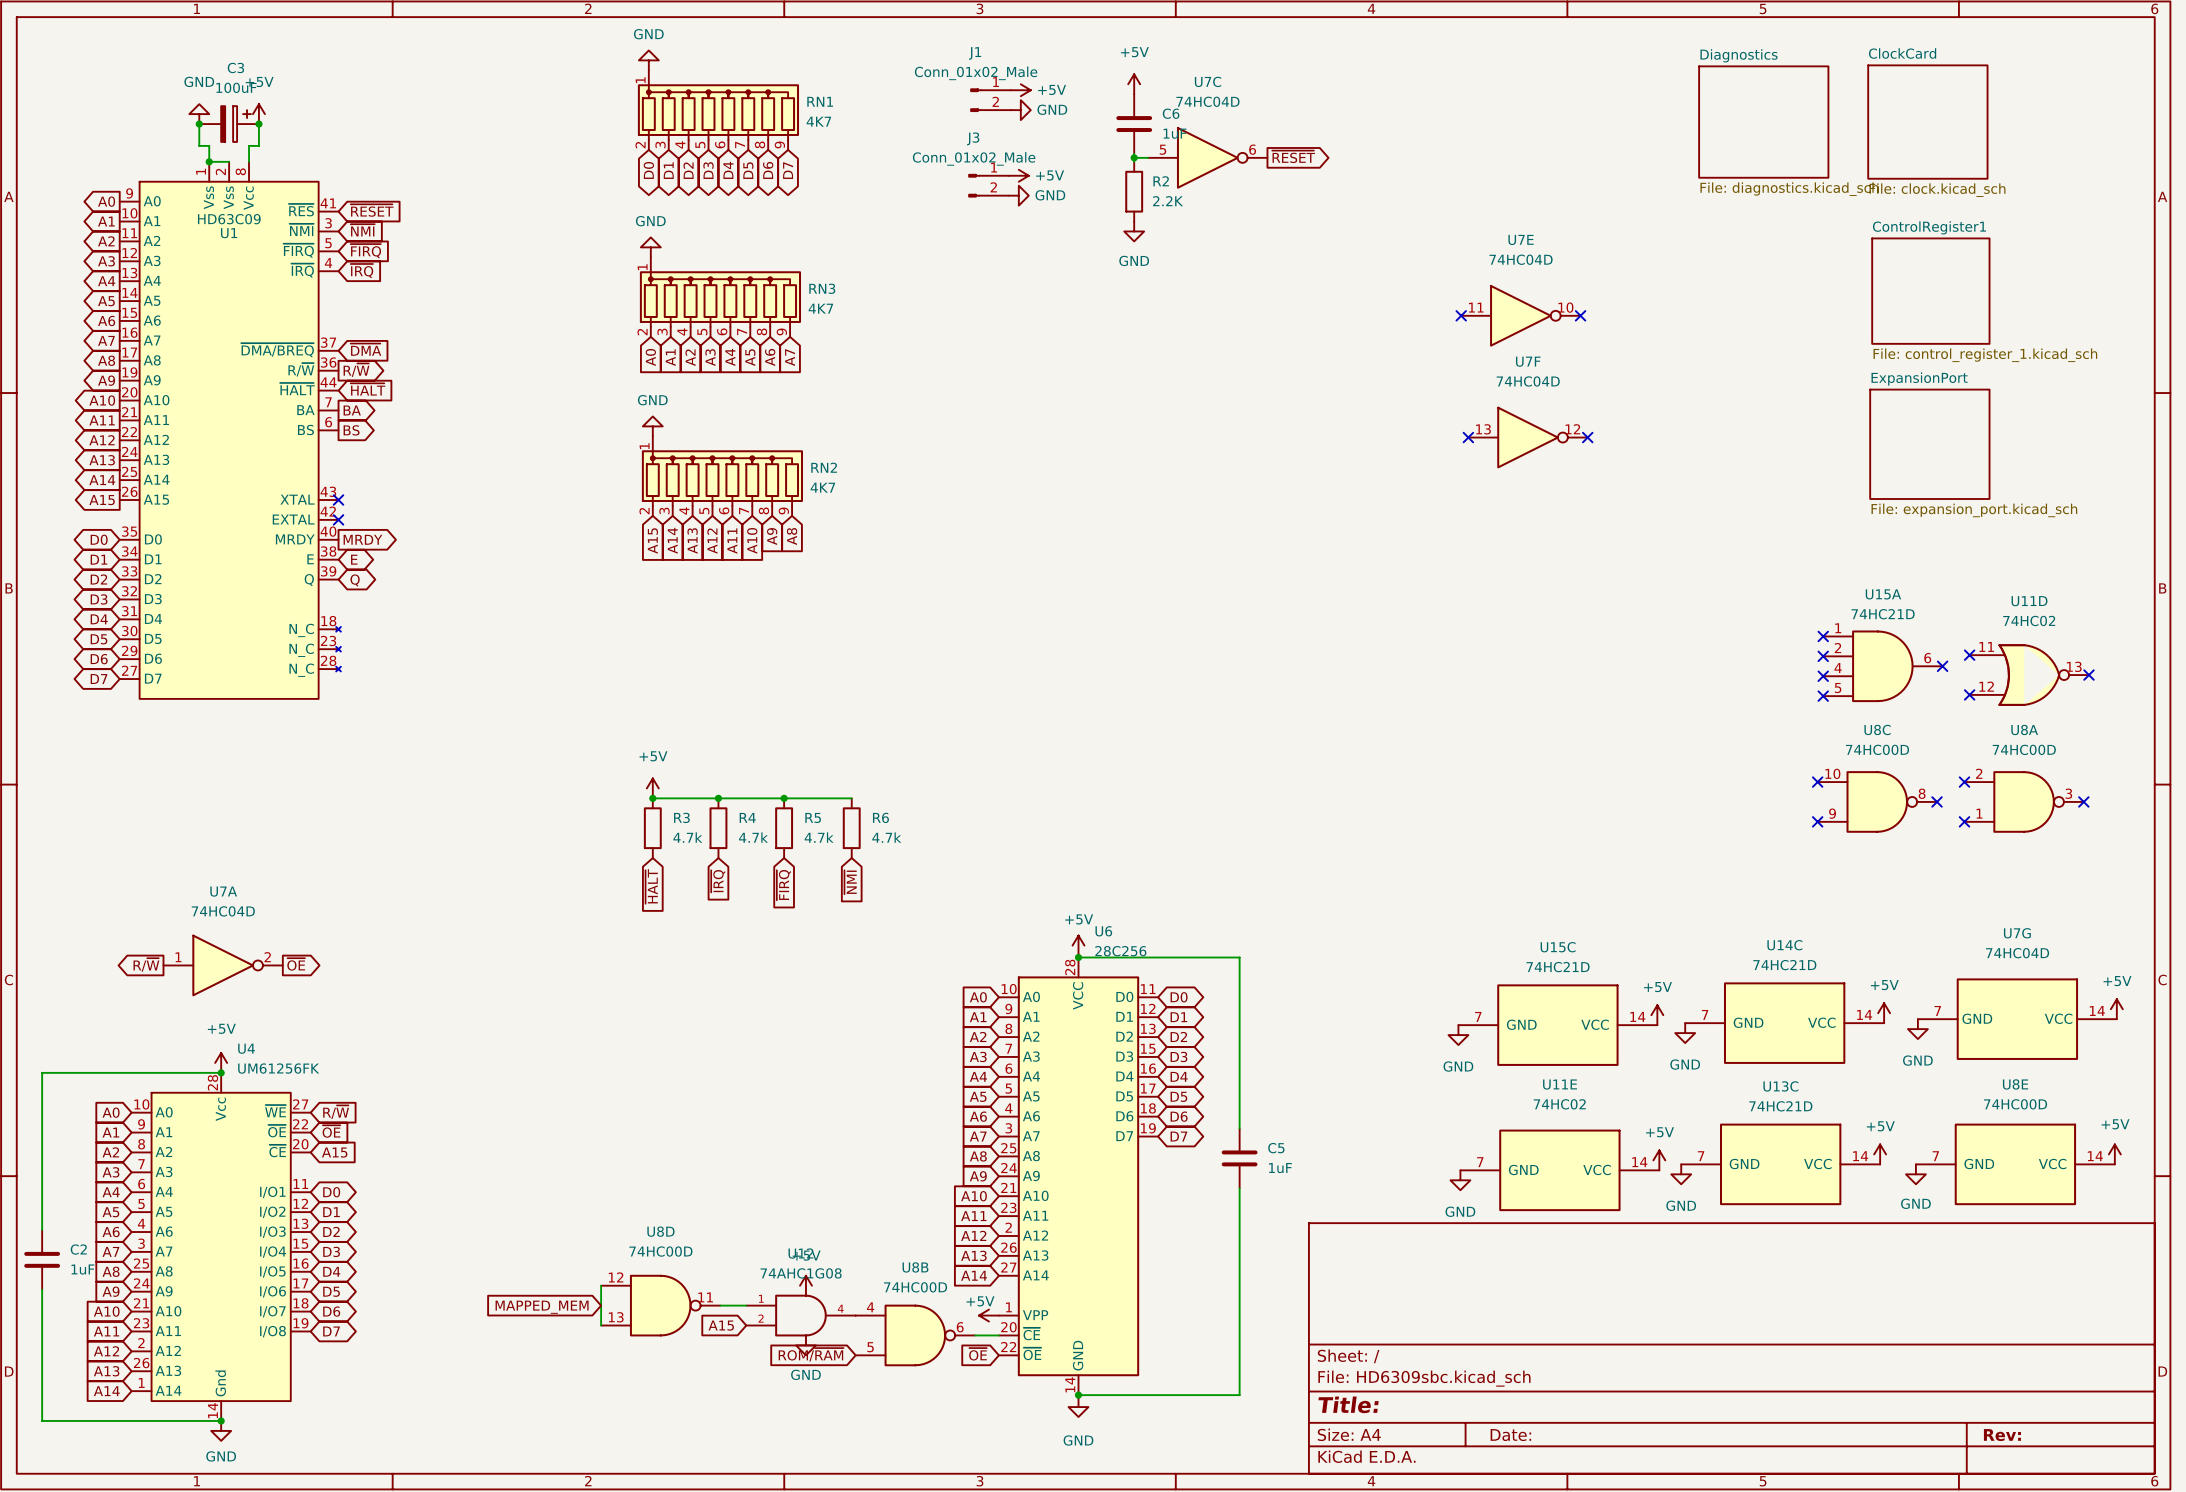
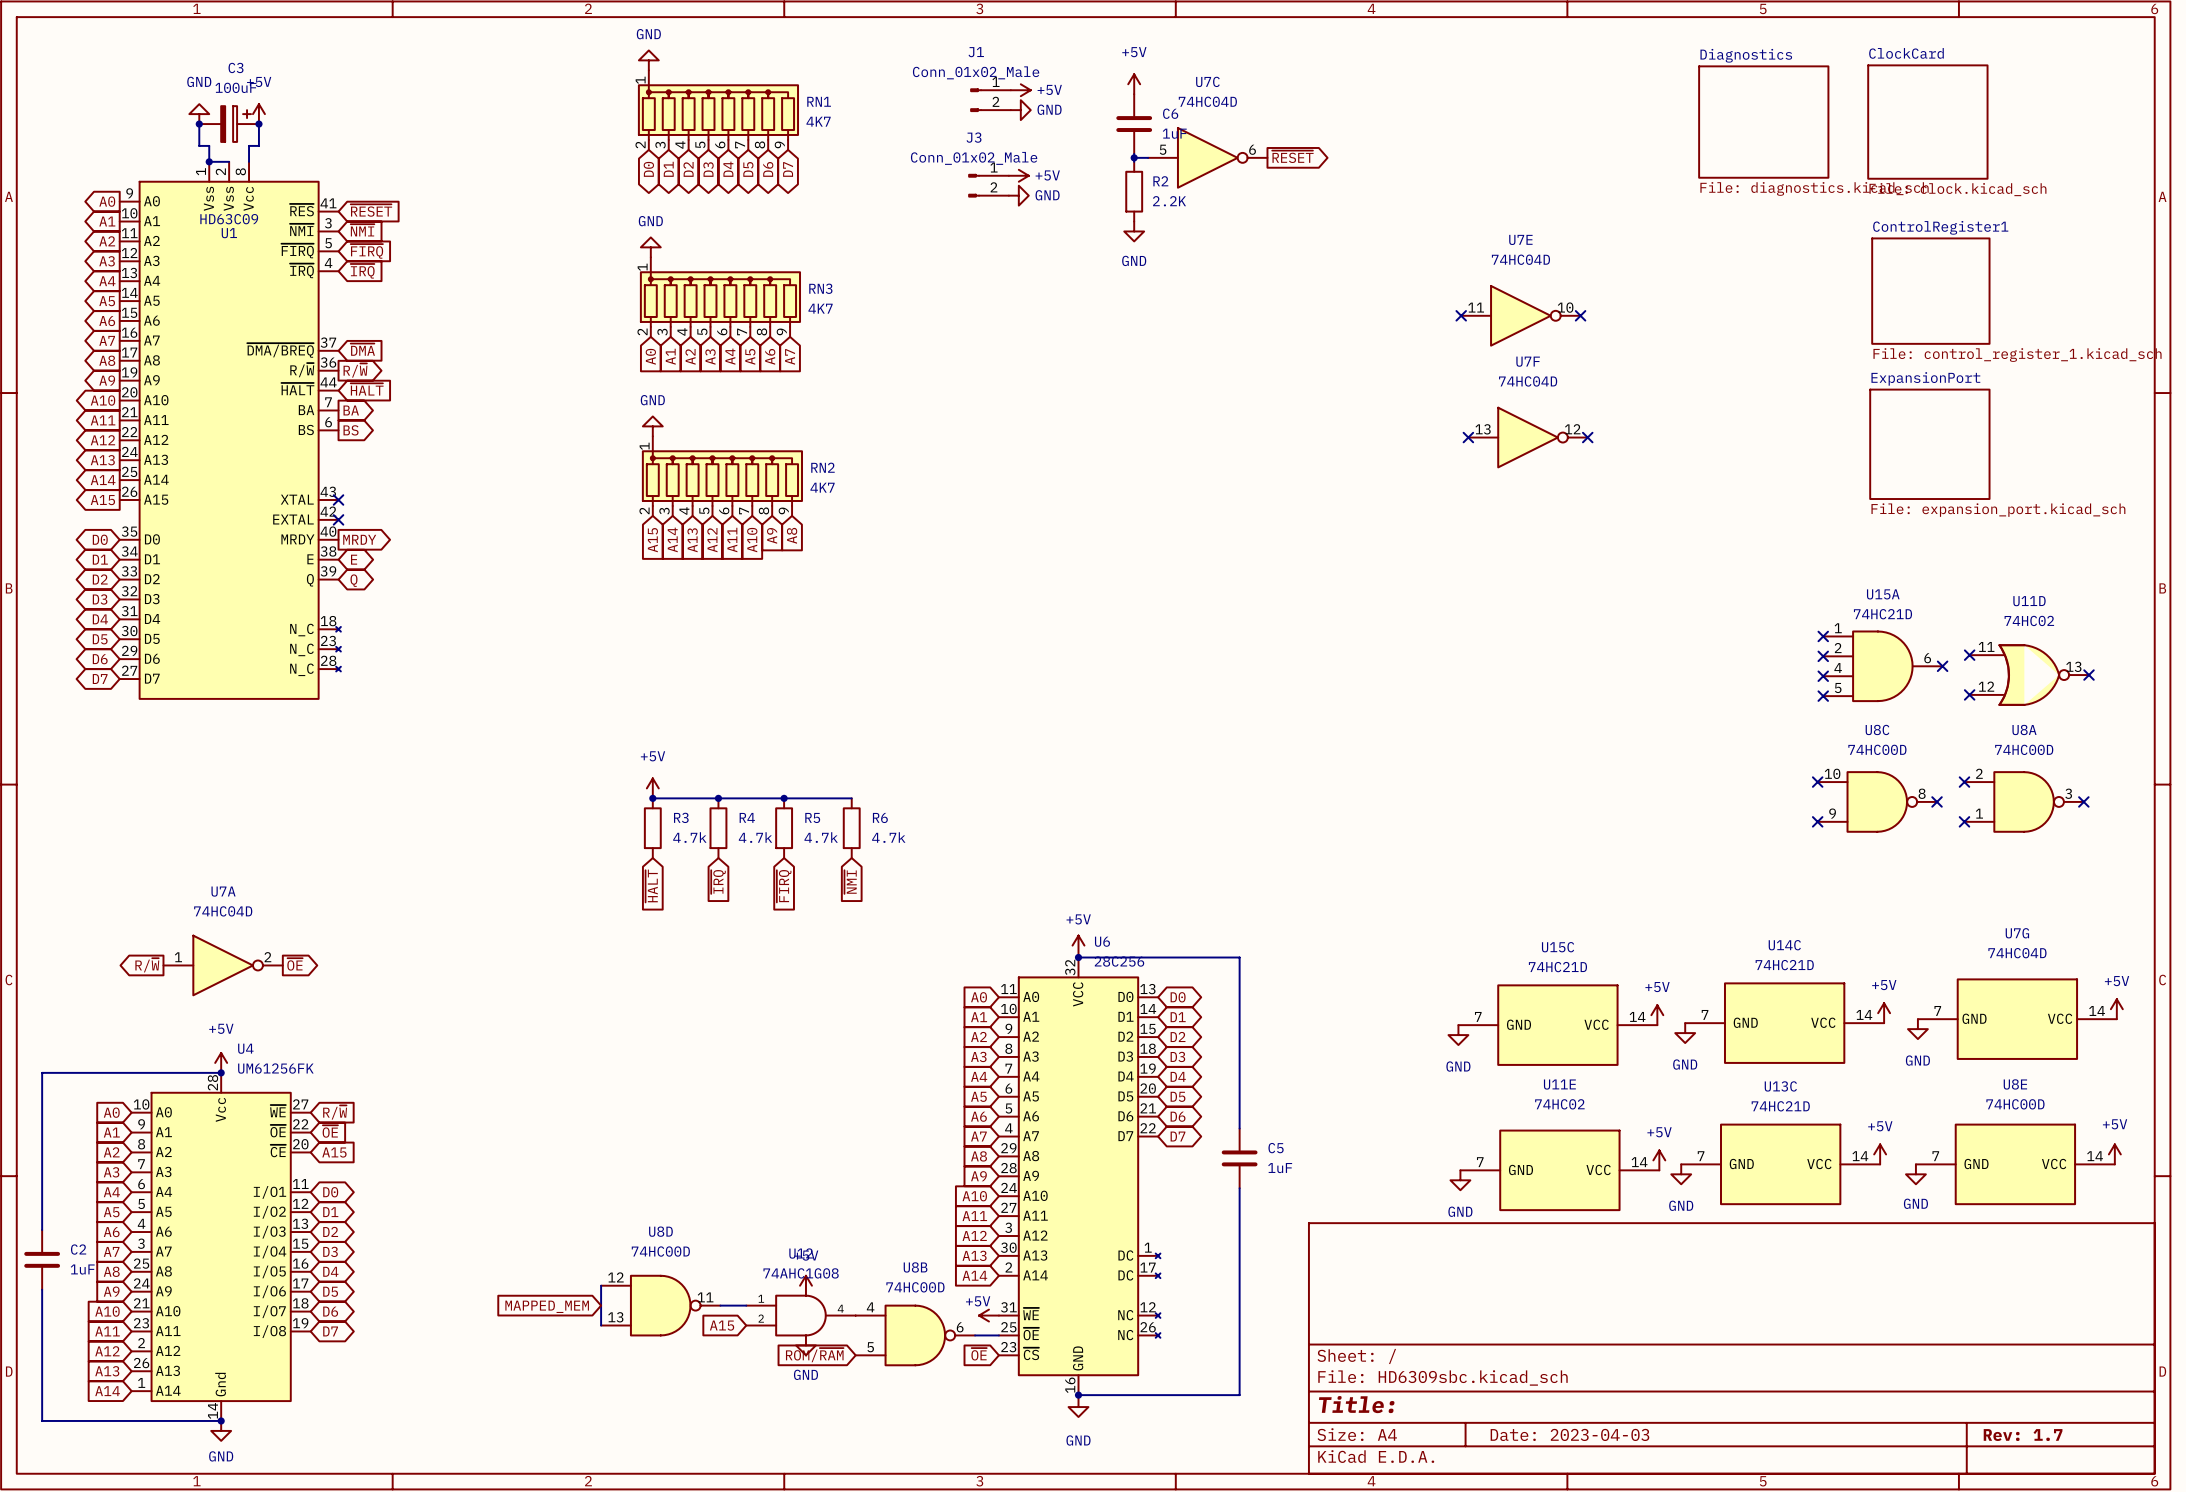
U6 symbol: [998, 957, 1159, 1396] -> [998, 957, 1161, 1396]
title block: Date: (1510, 1435) -> Date: 2023-04-03 (1569, 1434)
title block: Rev: (2002, 1435) -> Rev: 1.7 (2023, 1435)

